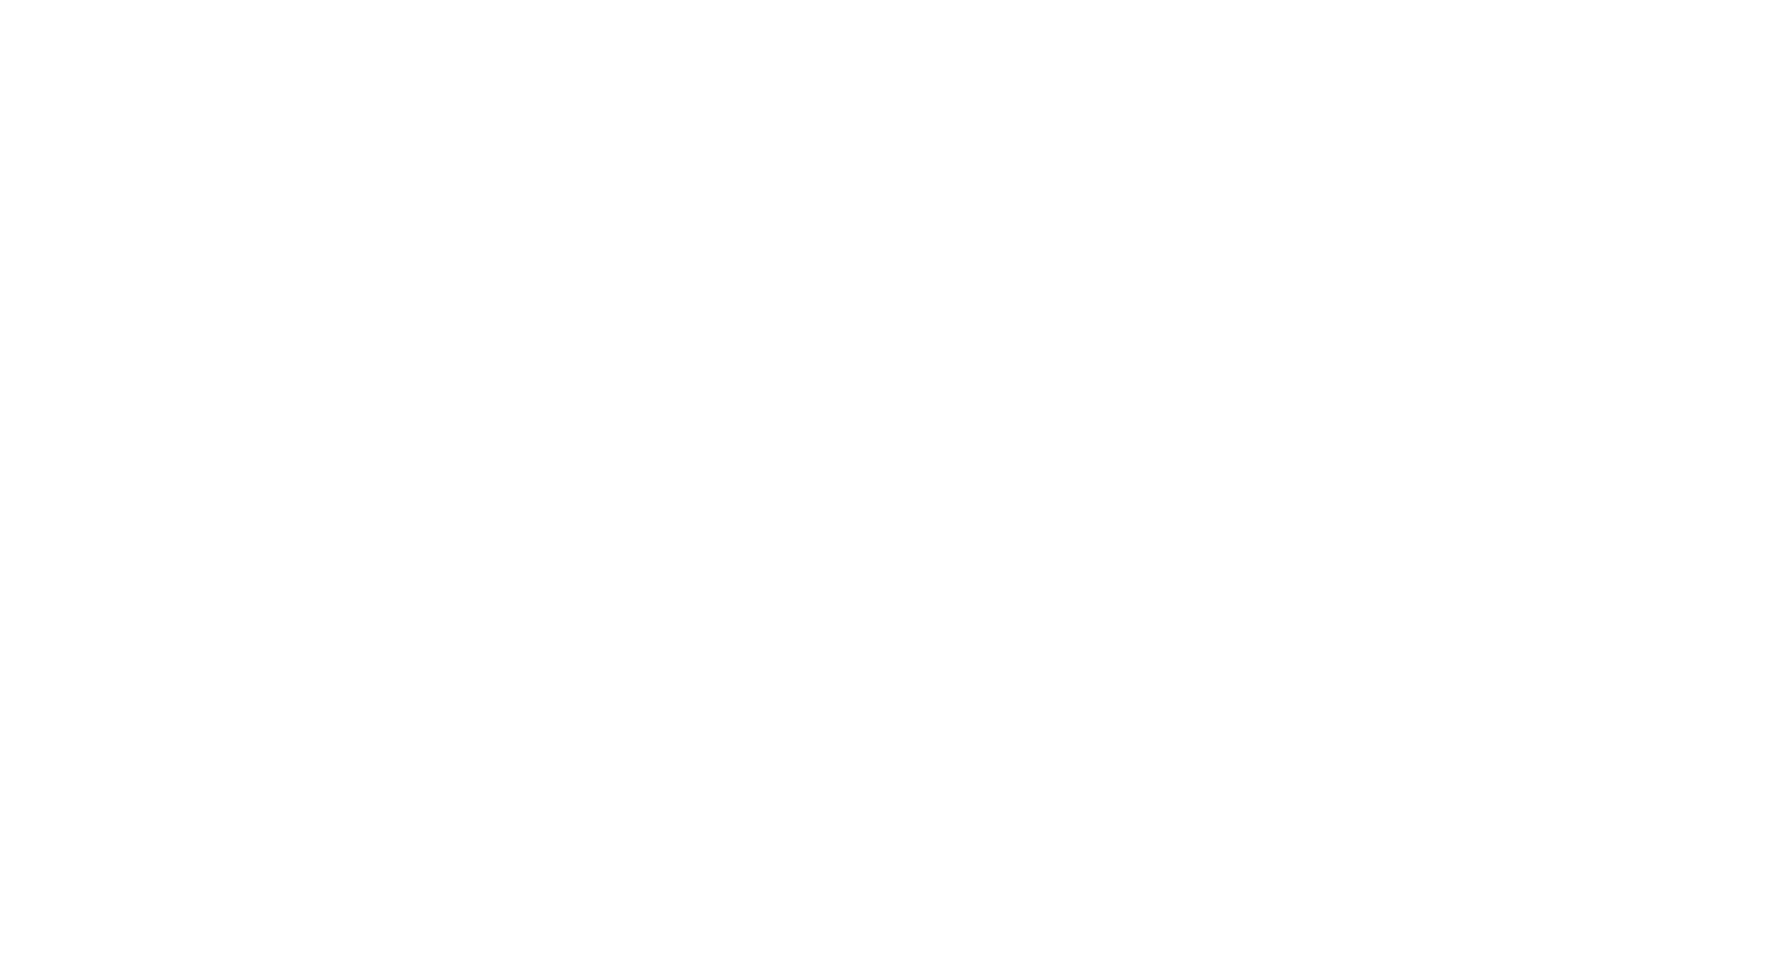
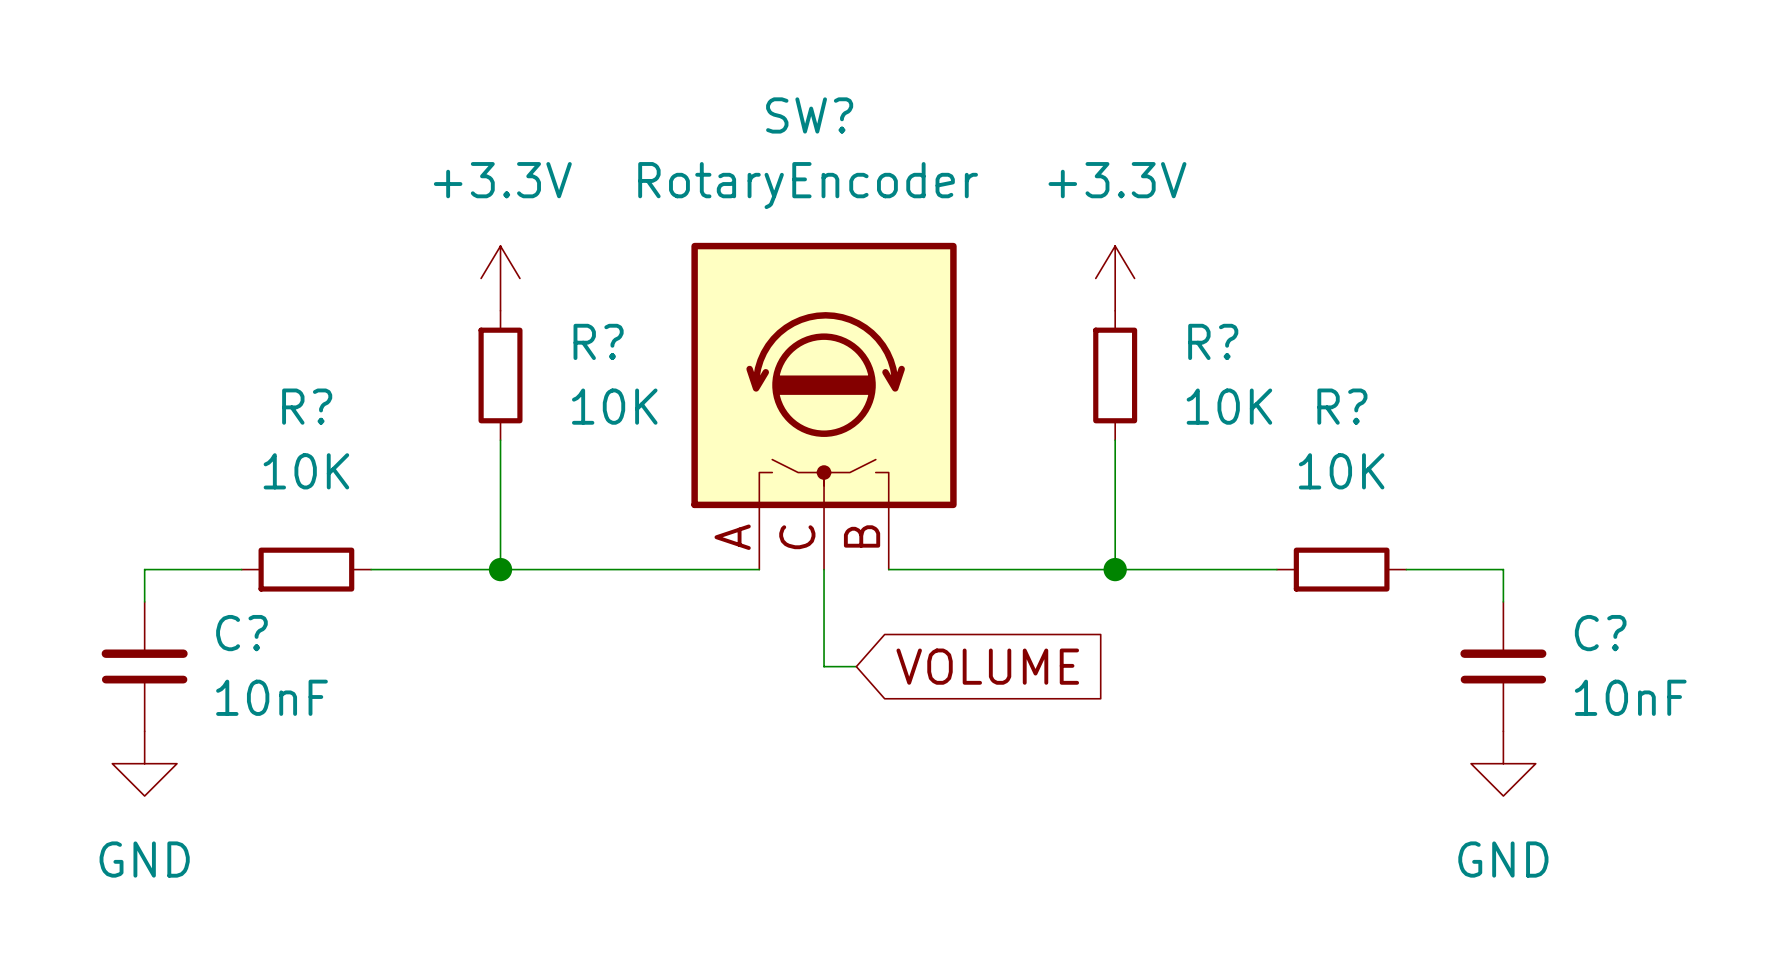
power symbol: none -> +3.3V (500, 278)
power symbol: none -> +3.3V (1115, 278)
R?: none -> 10K (500, 375)
R?: none -> 10K (1115, 375)
SW?: none -> RotaryEncoder (824, 406)
wire: none -> (500, 440) (500, 569)
wire: none -> (1115, 440) (1115, 569)
wire: none -> (241, 569) (144, 569) (144, 601)
R?: none -> 10K (306, 569)
wire: none -> (371, 569) (759, 569)
junction: none -> (500, 569)
wire: none -> (824, 569) (824, 666) (856, 666)
wire: none -> (888, 569) (1276, 569)
junction: none -> (1115, 569)
R?: none -> 10K (1341, 569)
wire: none -> (1406, 569) (1503, 569) (1503, 601)
C?: none -> 10nF (144, 666)
global label: none -> VOLUME (987, 666)
C?: none -> 10nF (1503, 666)
power symbol: none -> GND (144, 763)
power symbol: none -> GND (1503, 763)

